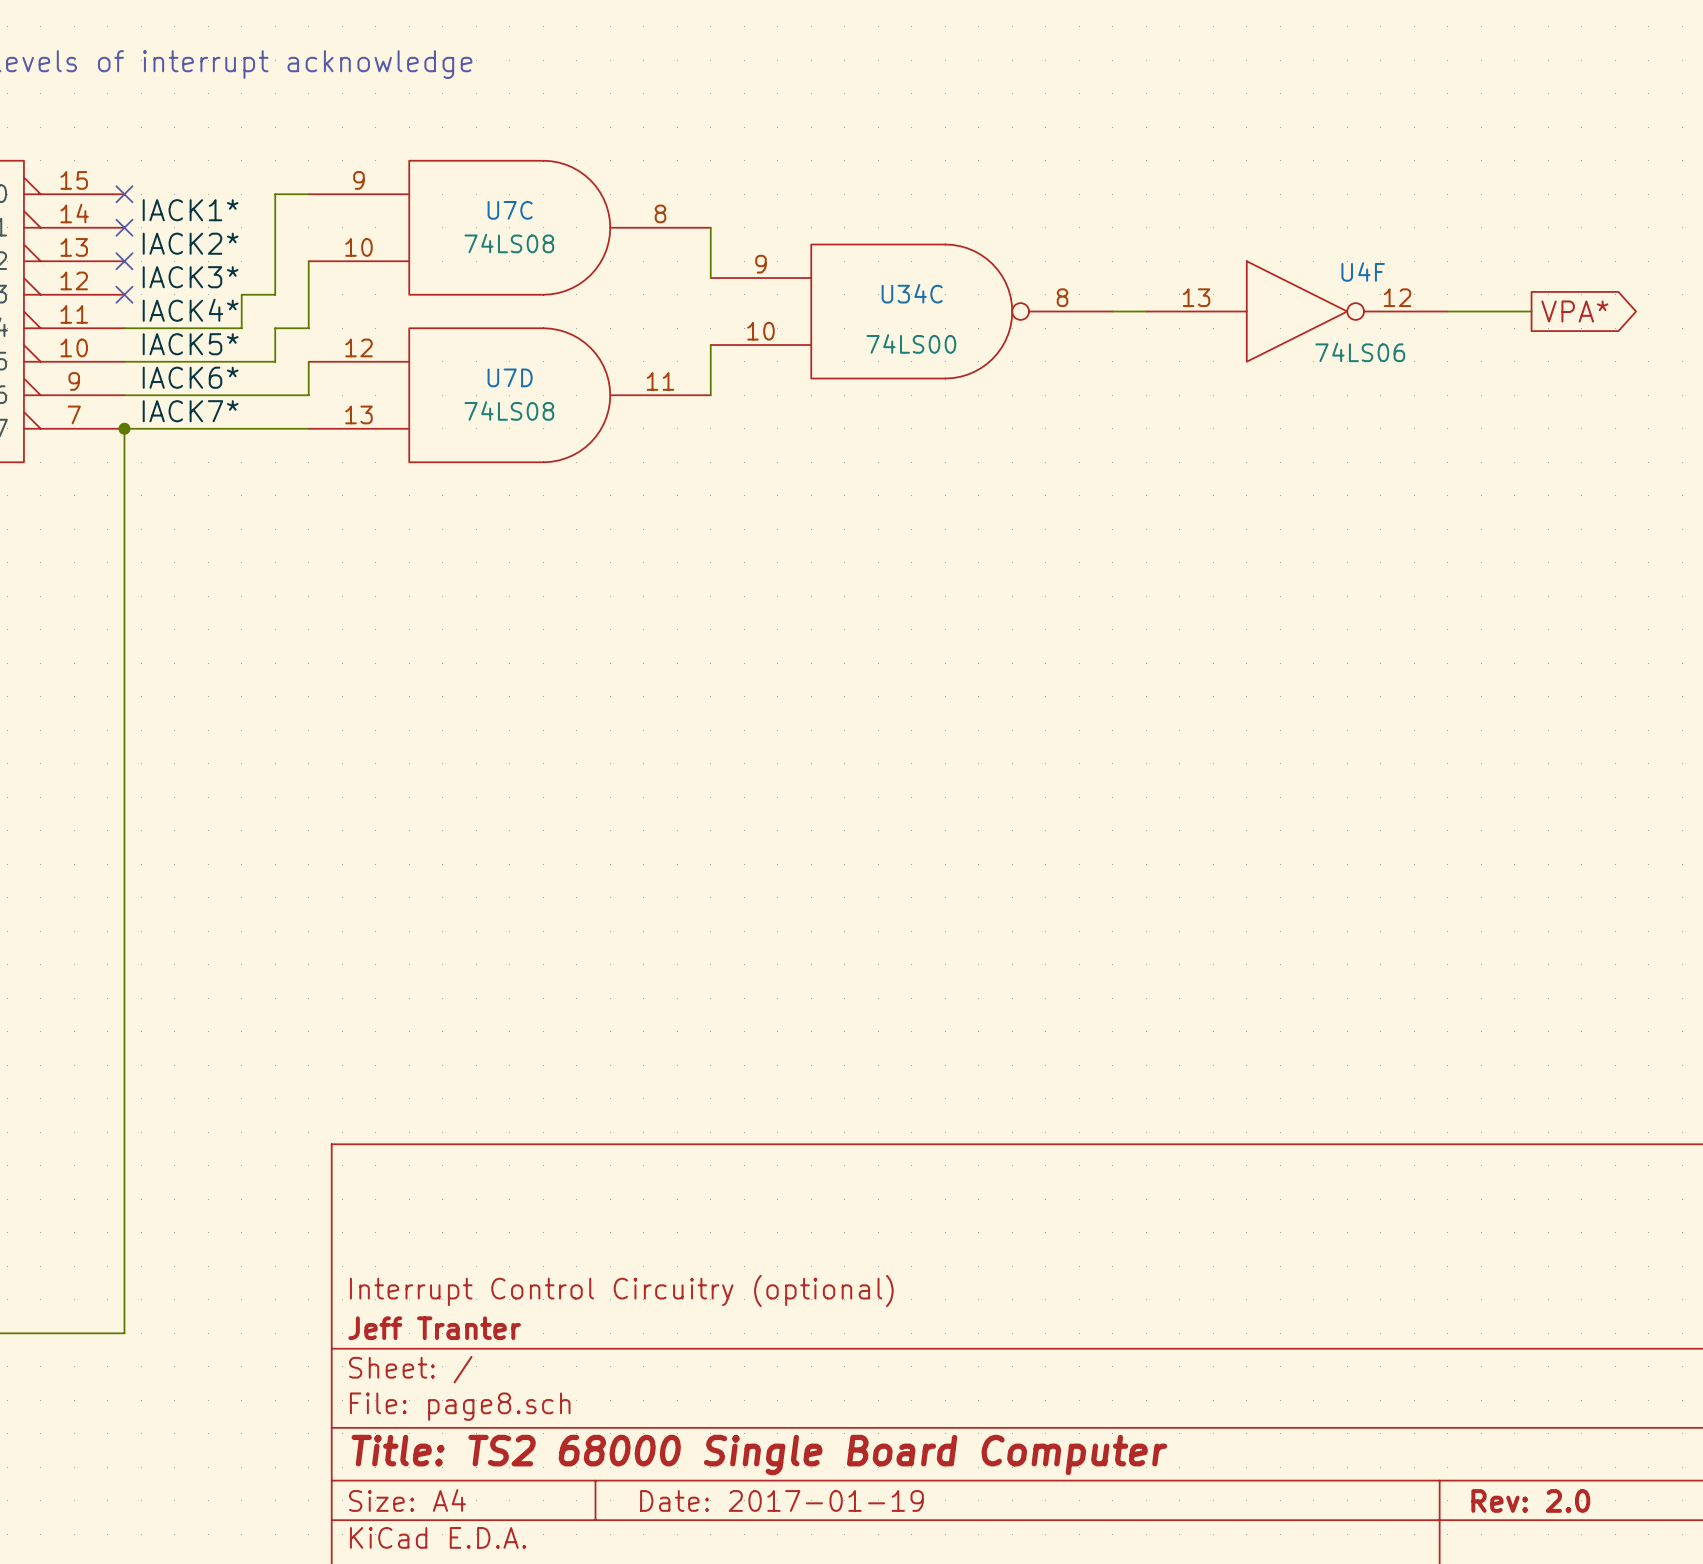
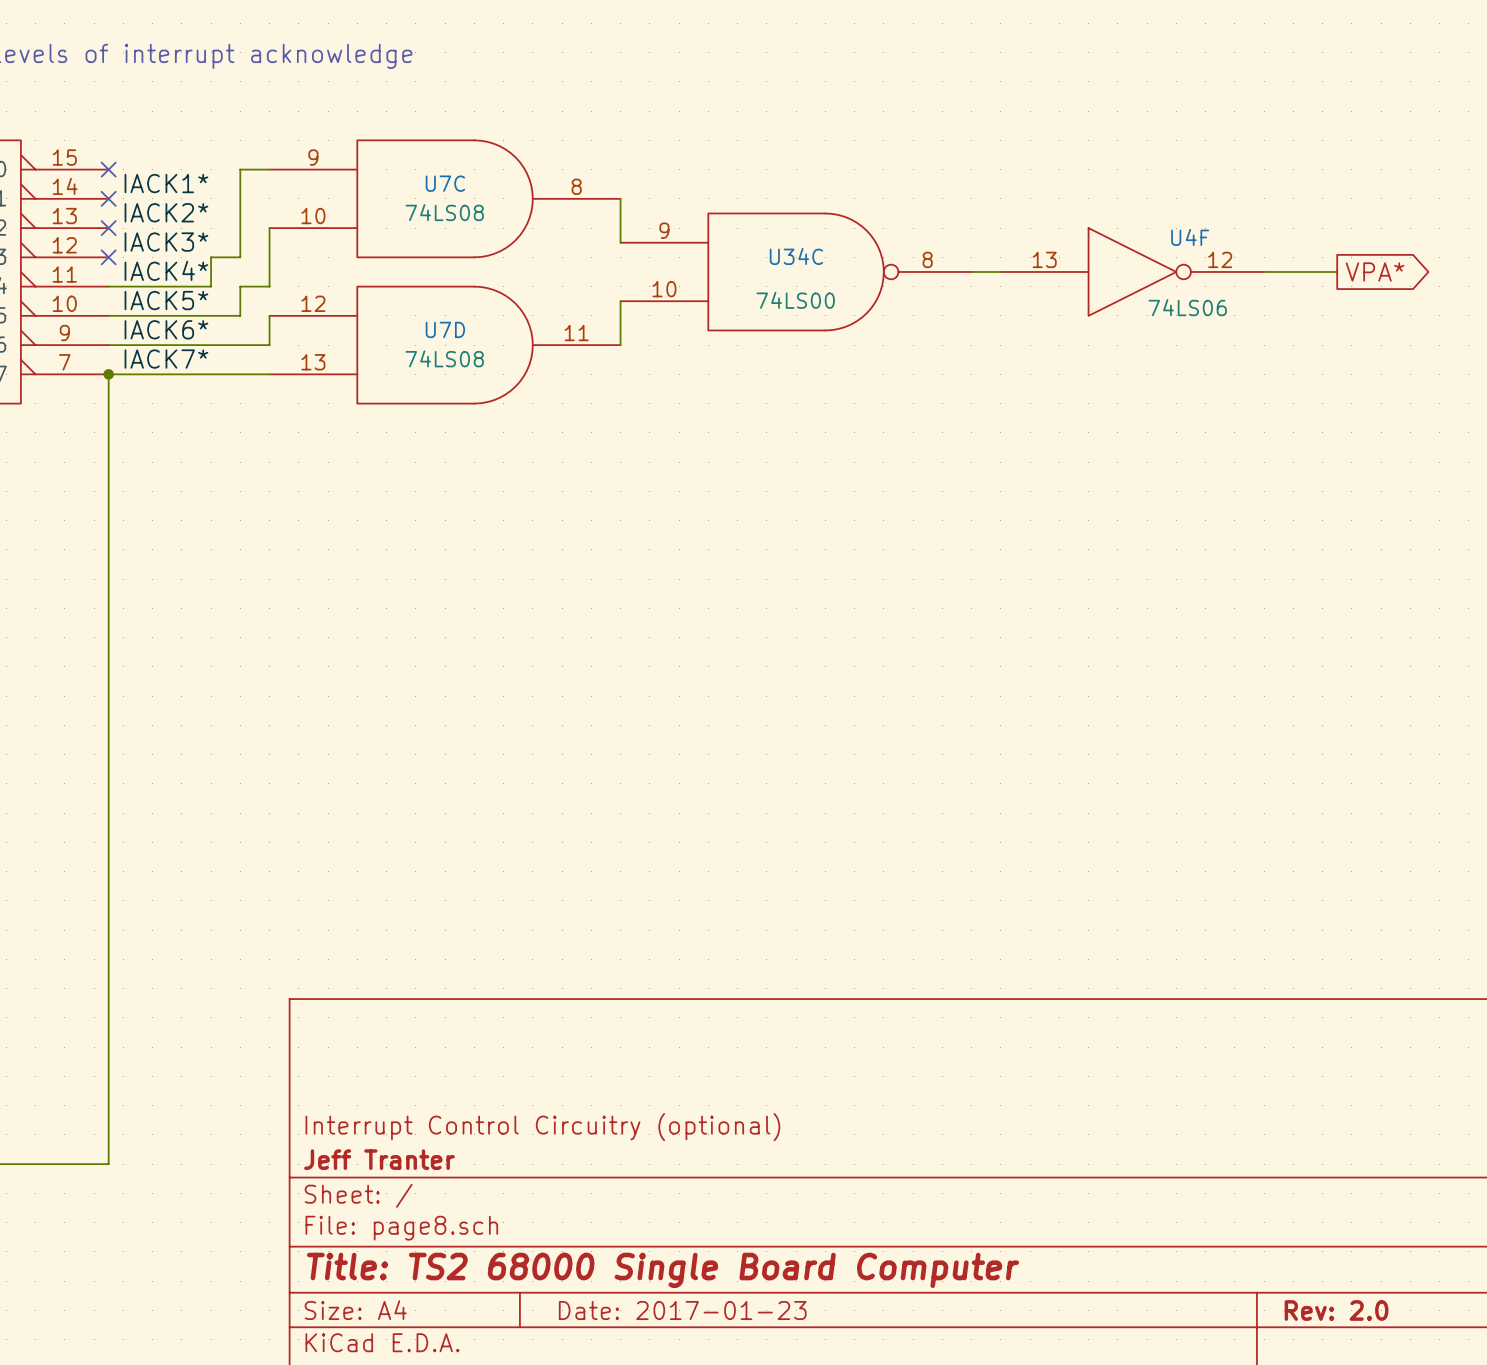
title block: Date: 2017-01-19 (781, 1500) -> Date: 2017-01-23 (682, 1310)

